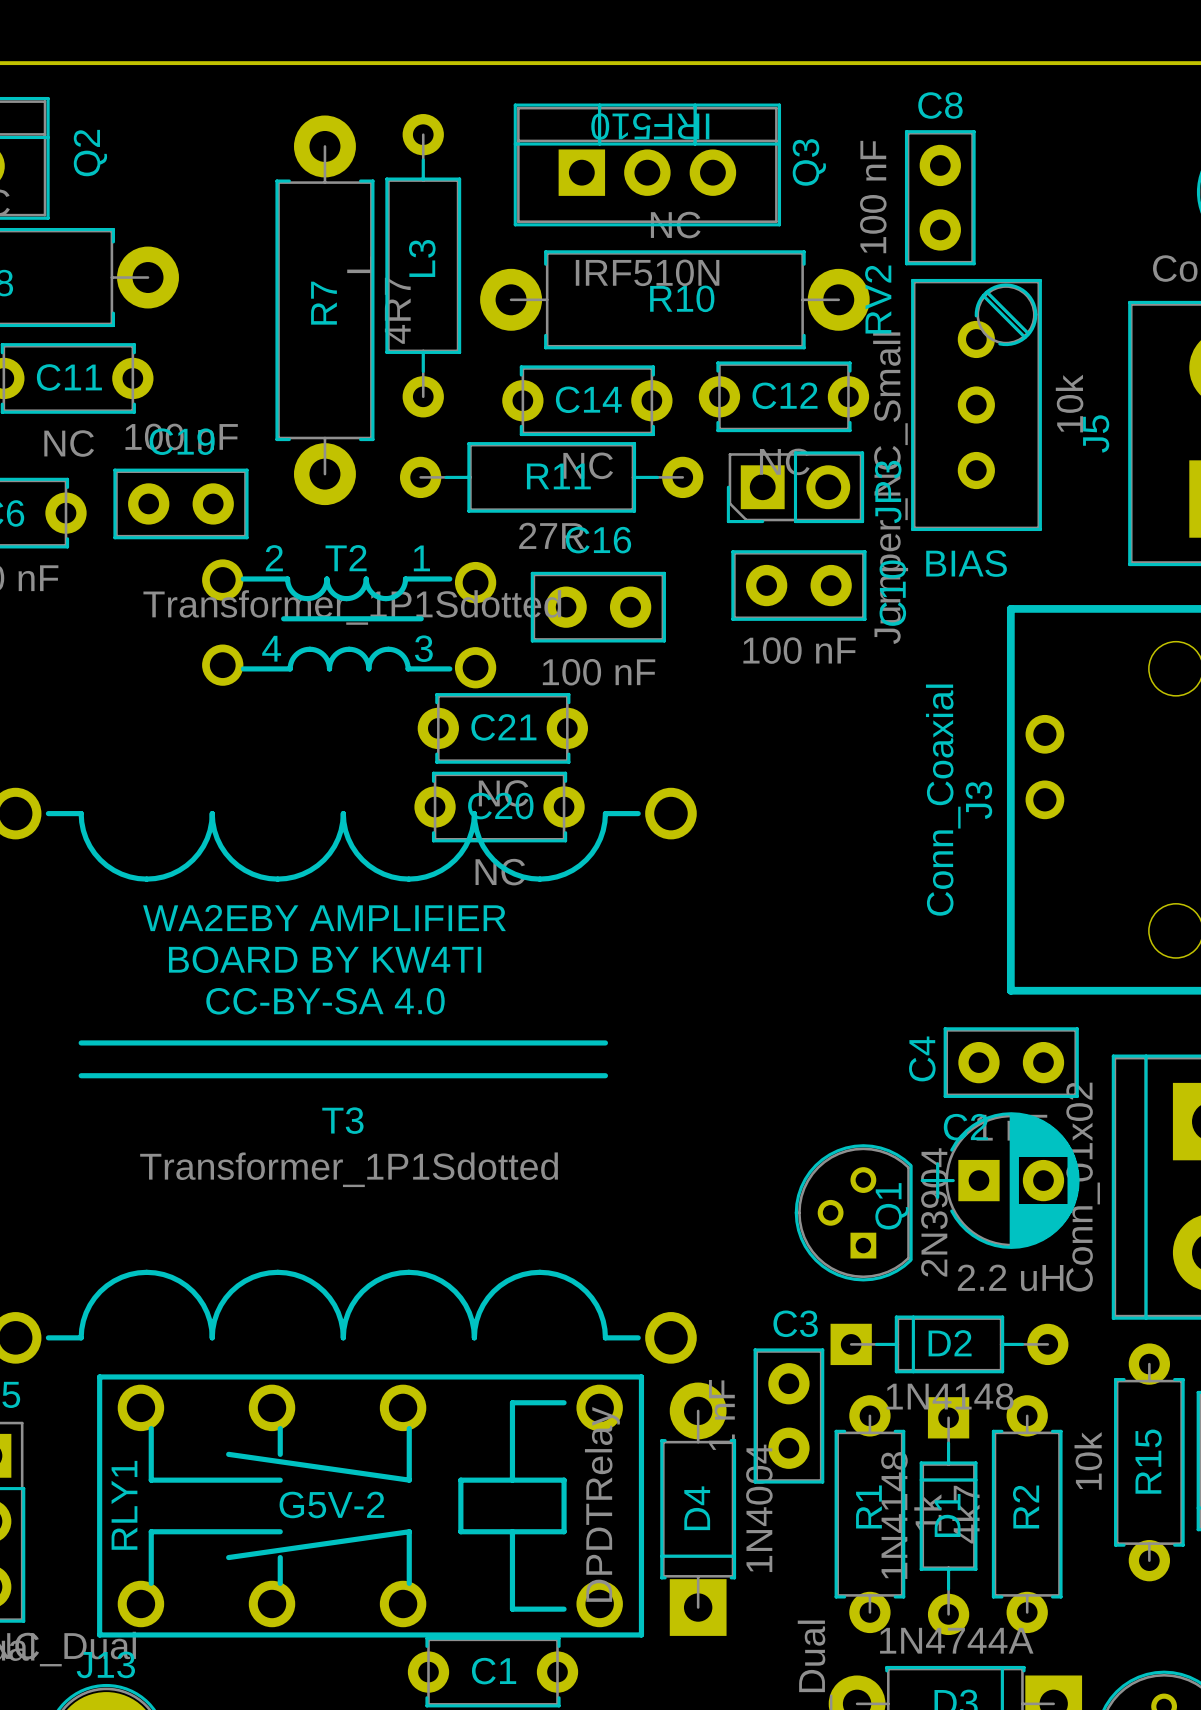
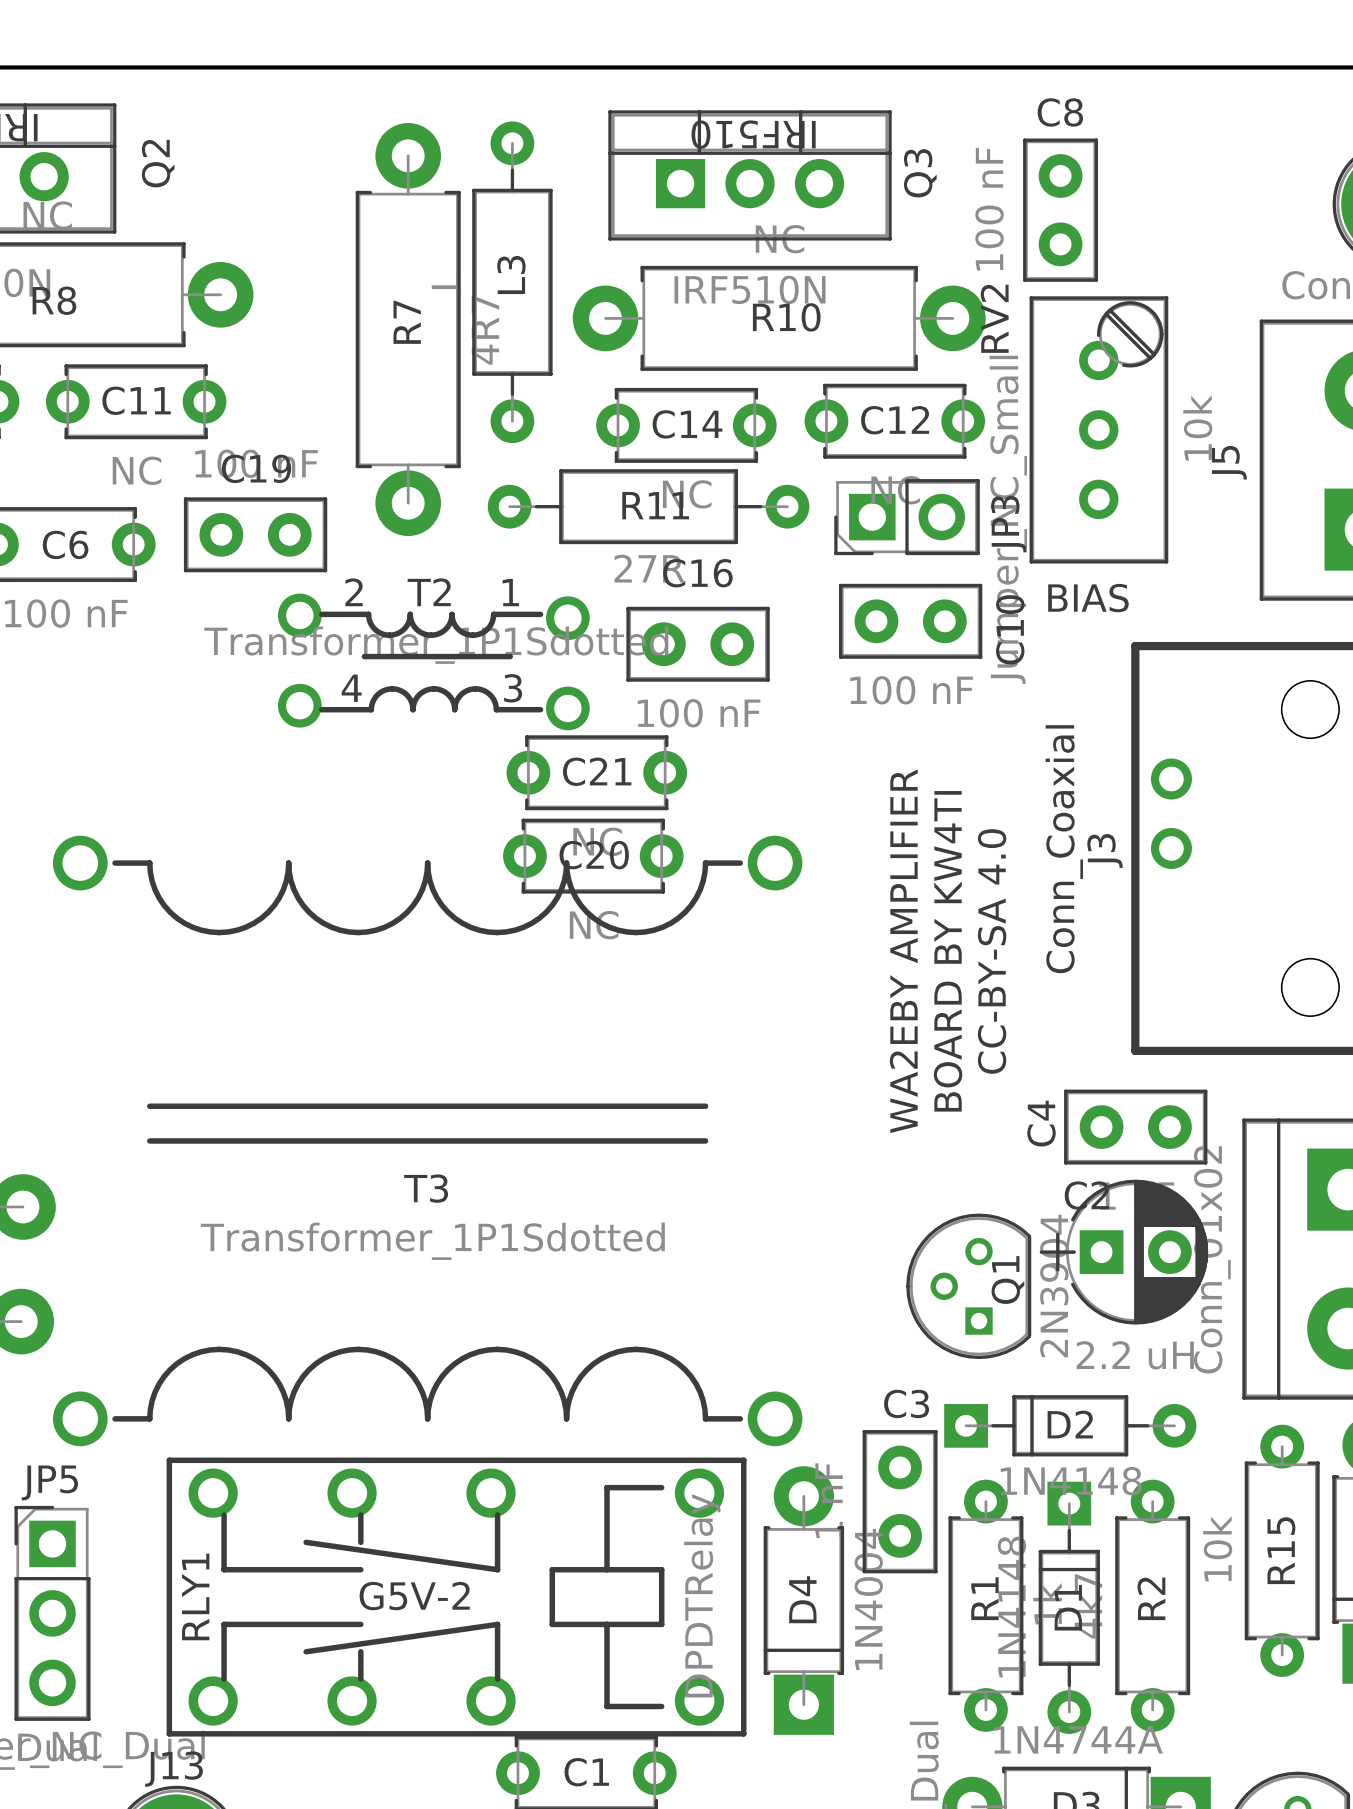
text rotation: 0° (324, 918) -> 90° counterclockwise (903, 951)
text position: WA2EBY AMPLIFIER (324, 918) -> WA2EBY AMPLIFIER (903, 951)
text rotation: 0° (325, 959) -> 90° counterclockwise (948, 951)
text position: BOARD BY KW4TI (325, 959) -> BOARD BY KW4TI (948, 951)
text rotation: 0° (325, 1001) -> 90° counterclockwise (992, 951)
text position: CC-BY-SA 4.0 (325, 1001) -> CC-BY-SA 4.0 (992, 951)

